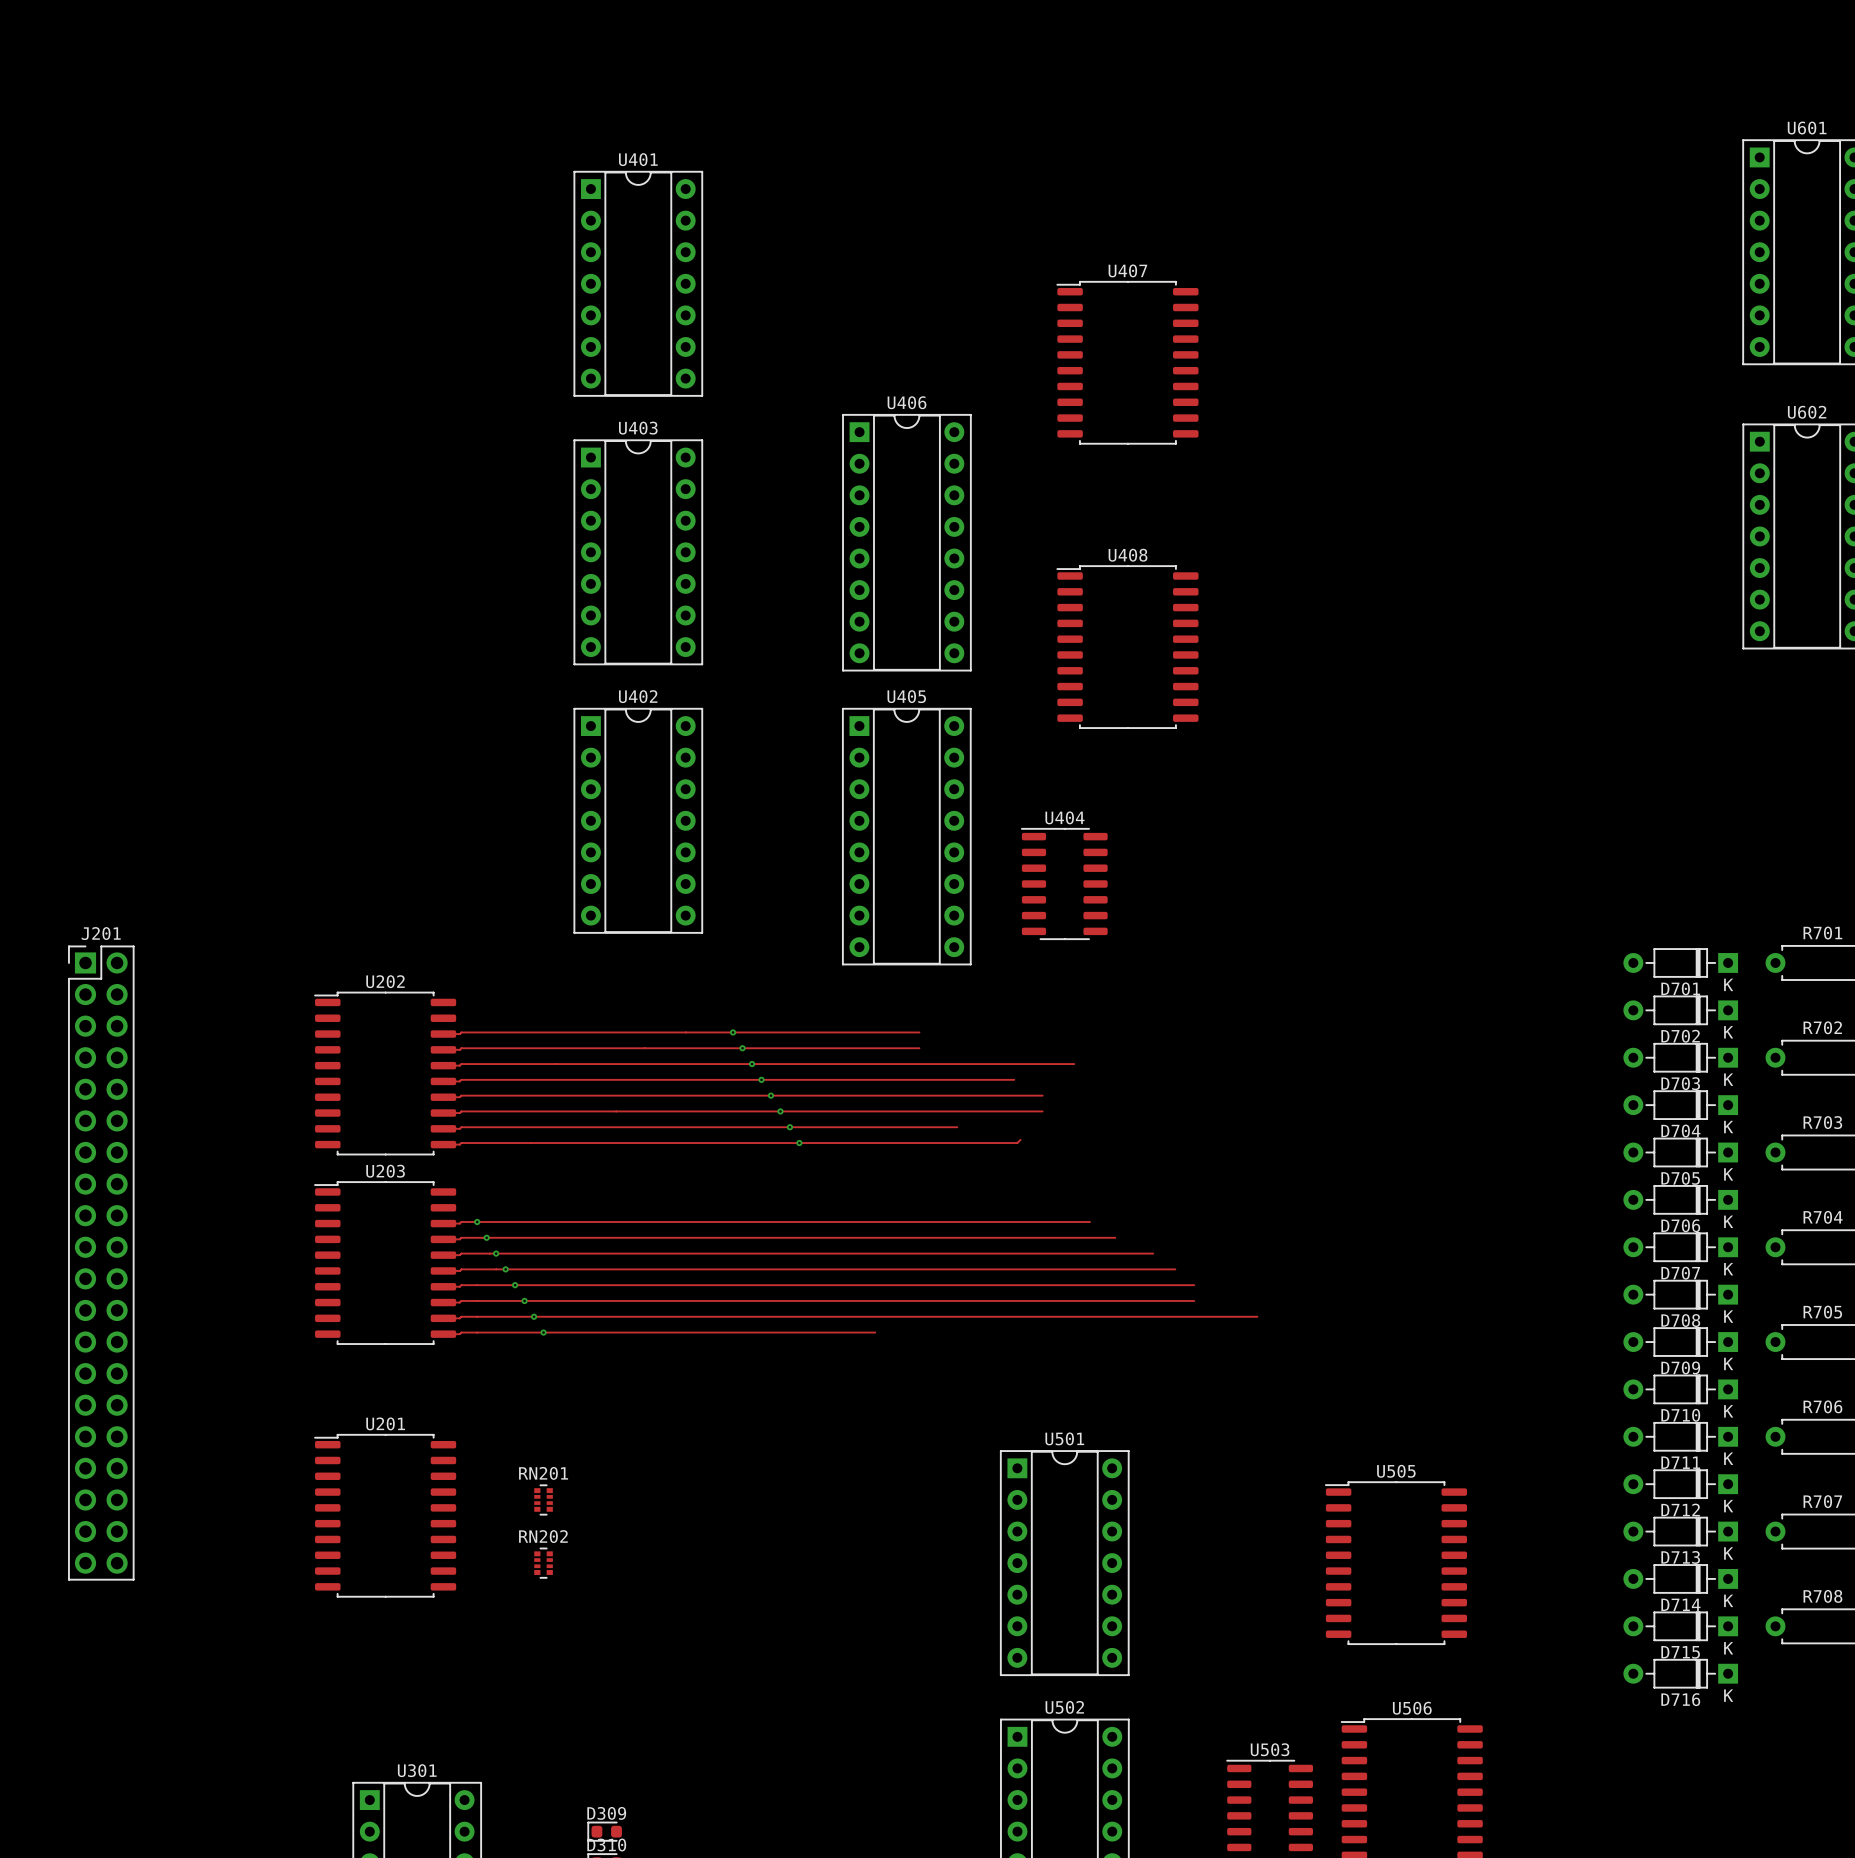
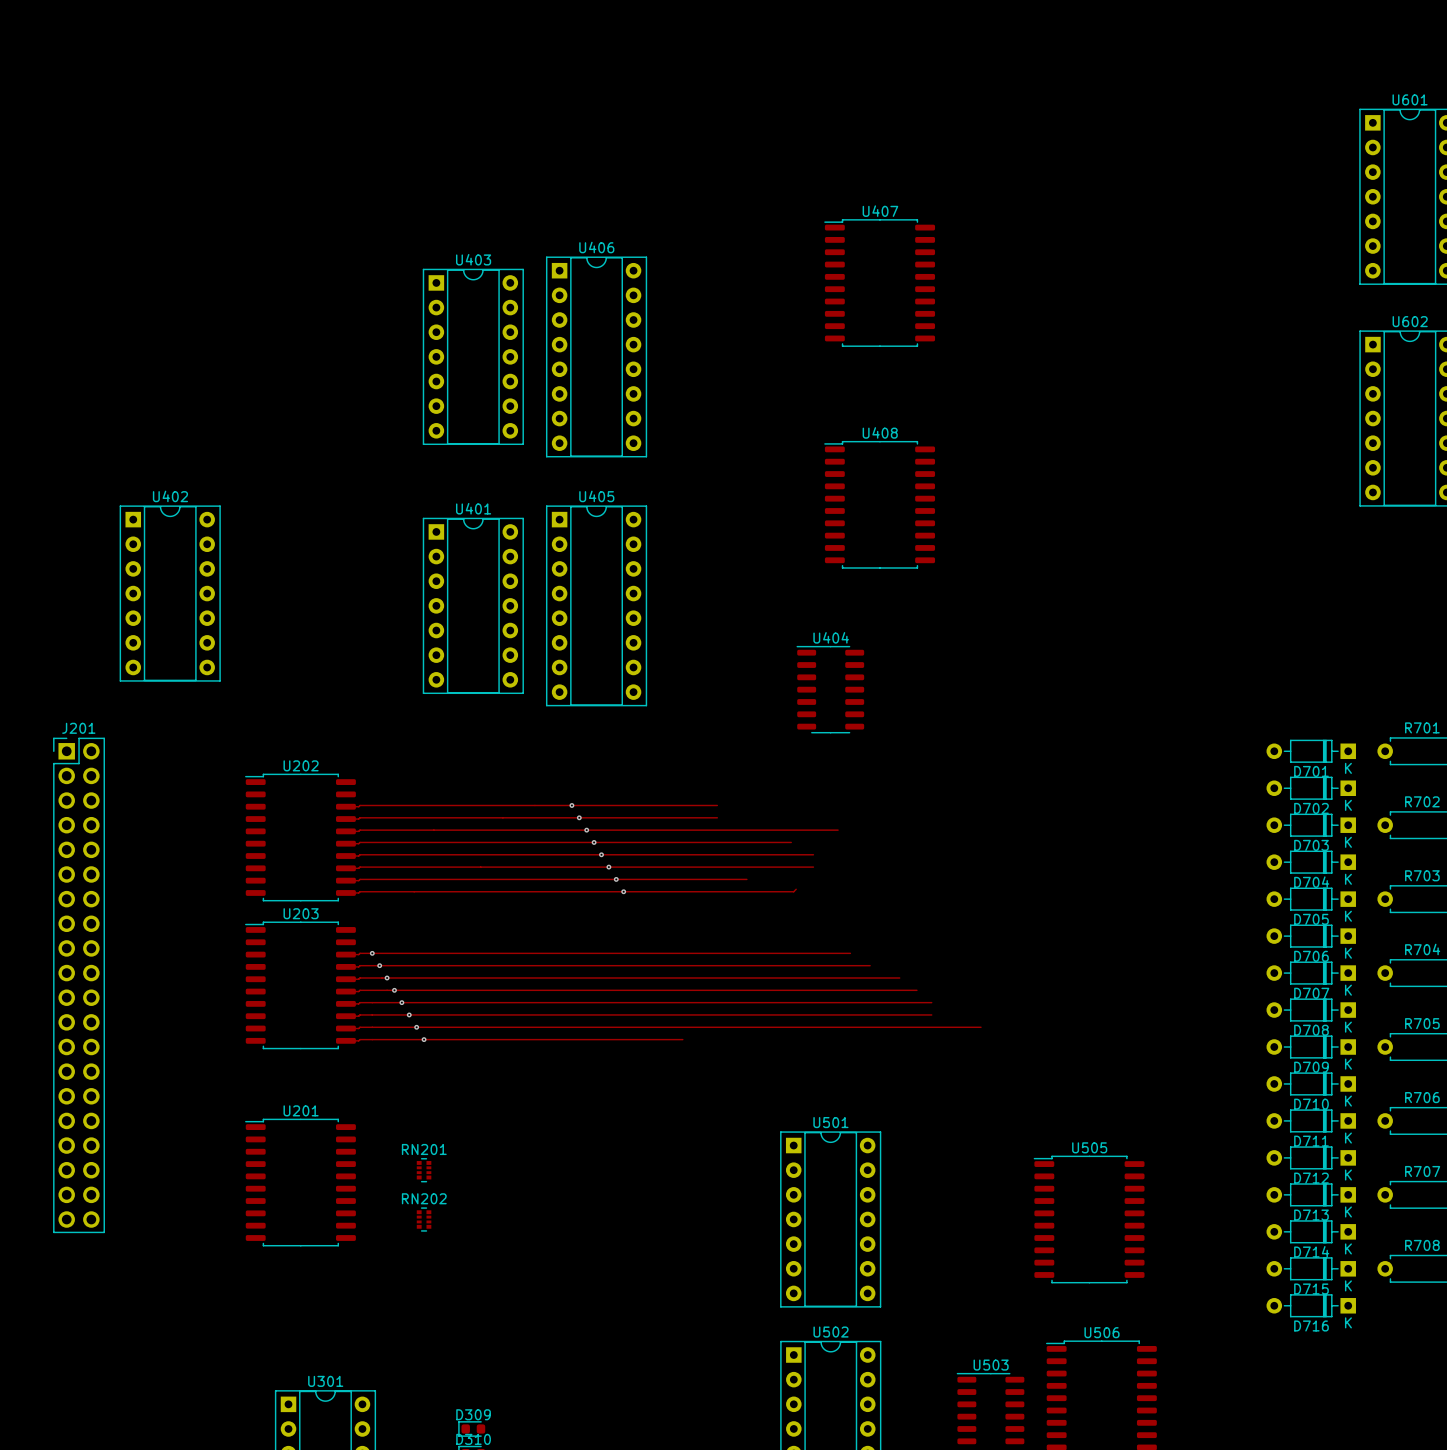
U401 position: (638, 283) -> (473, 605)
U406 position: (906, 542) -> (596, 356)
U403 position: (638, 552) -> (473, 356)
U402 position: (638, 820) -> (170, 593)
U405 position: (906, 836) -> (596, 605)

